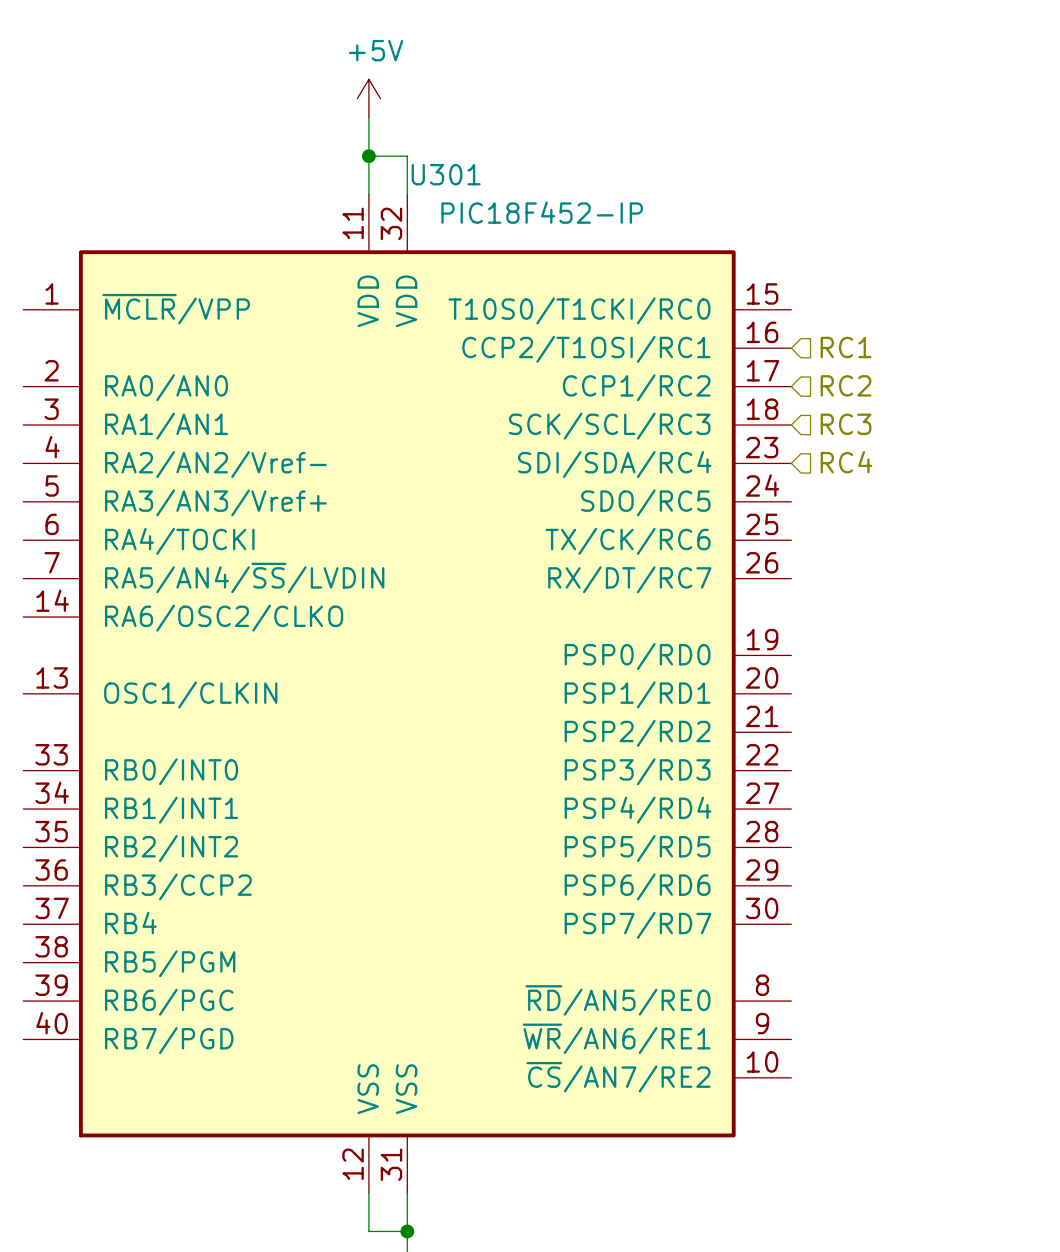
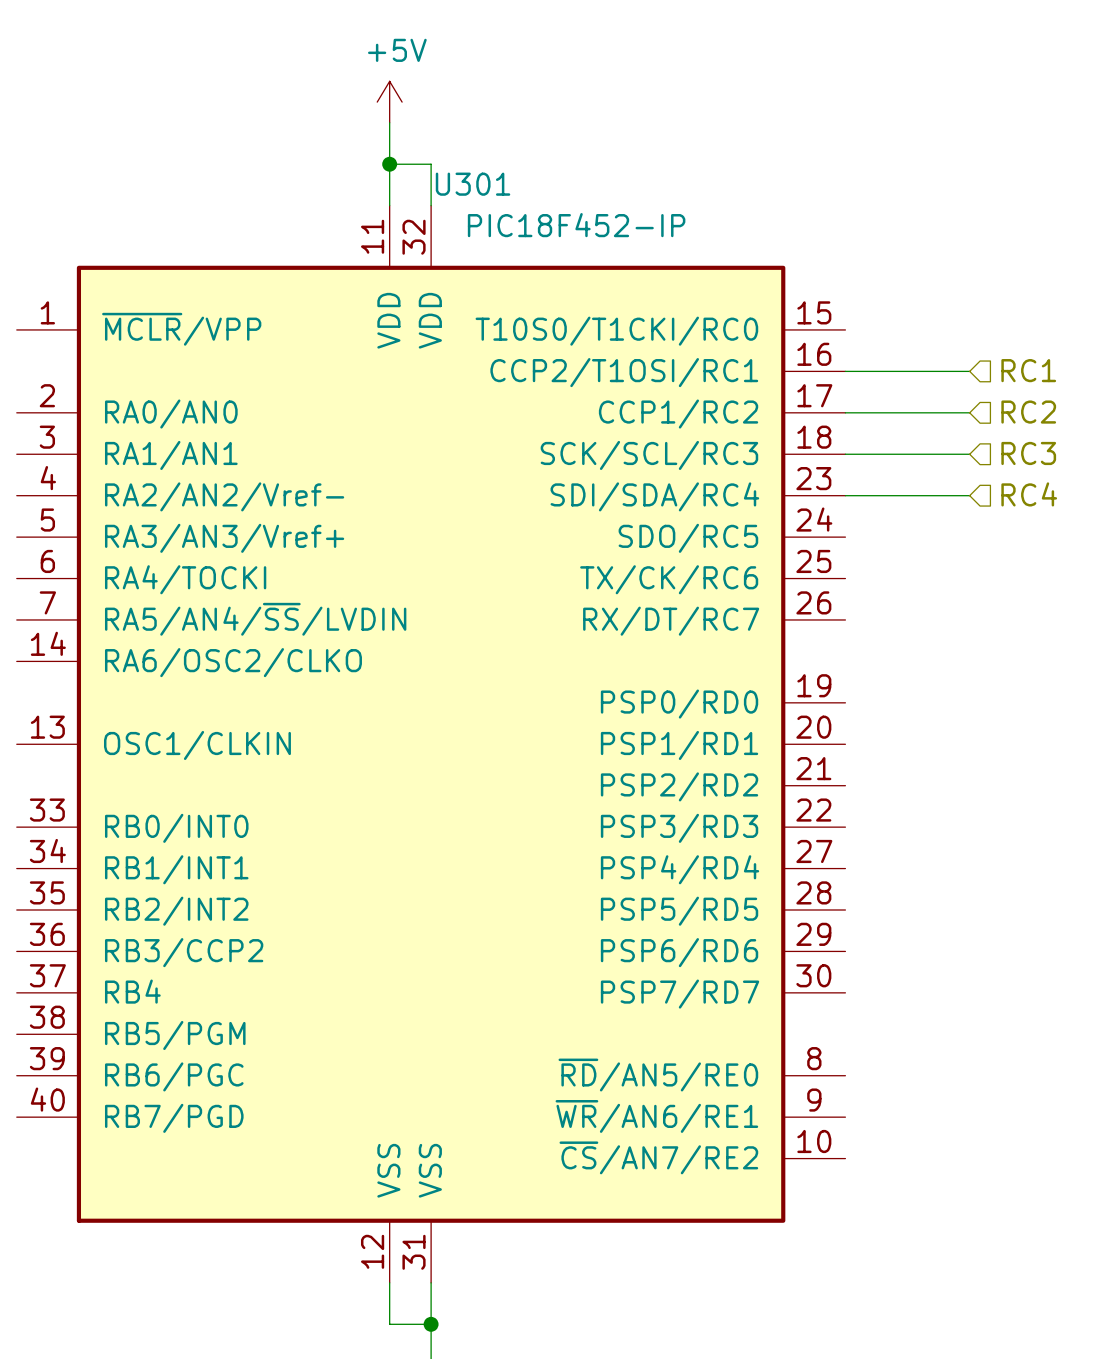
hierarchical label position: RC1 (846, 347) -> RC1 (1028, 370)
wire: none -> (845, 371) (969, 371)
hierarchical label position: RC2 (846, 385) -> RC2 (1028, 412)
wire: none -> (845, 412) (969, 412)
hierarchical label position: RC3 (846, 424) -> RC3 (1028, 453)
wire: none -> (845, 454) (969, 454)
hierarchical label position: RC4 (846, 462) -> RC4 (1029, 494)
wire: none -> (845, 495) (969, 495)

